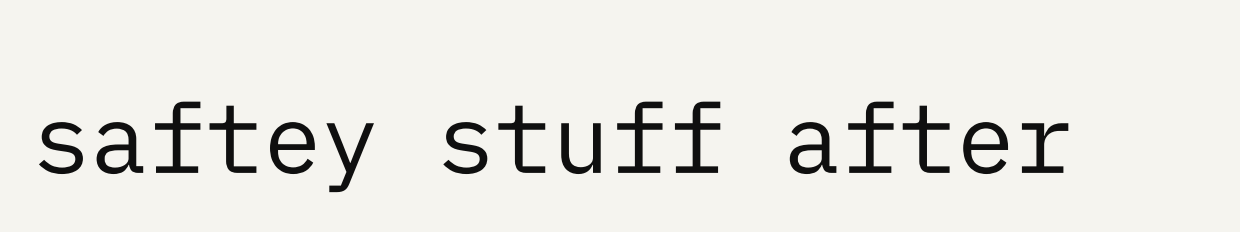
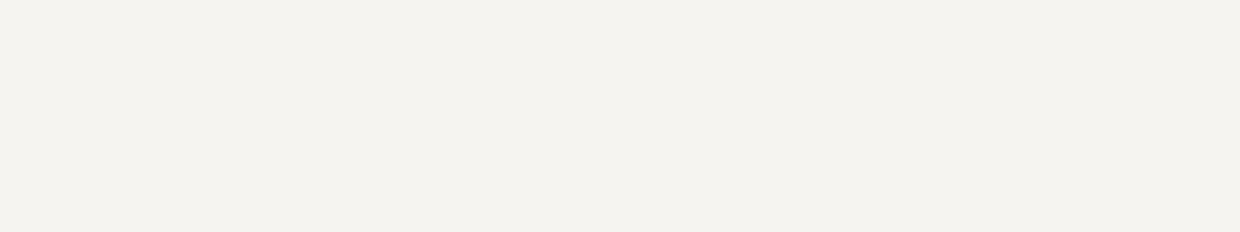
label: saftey stuff after (553, 146) -> none

